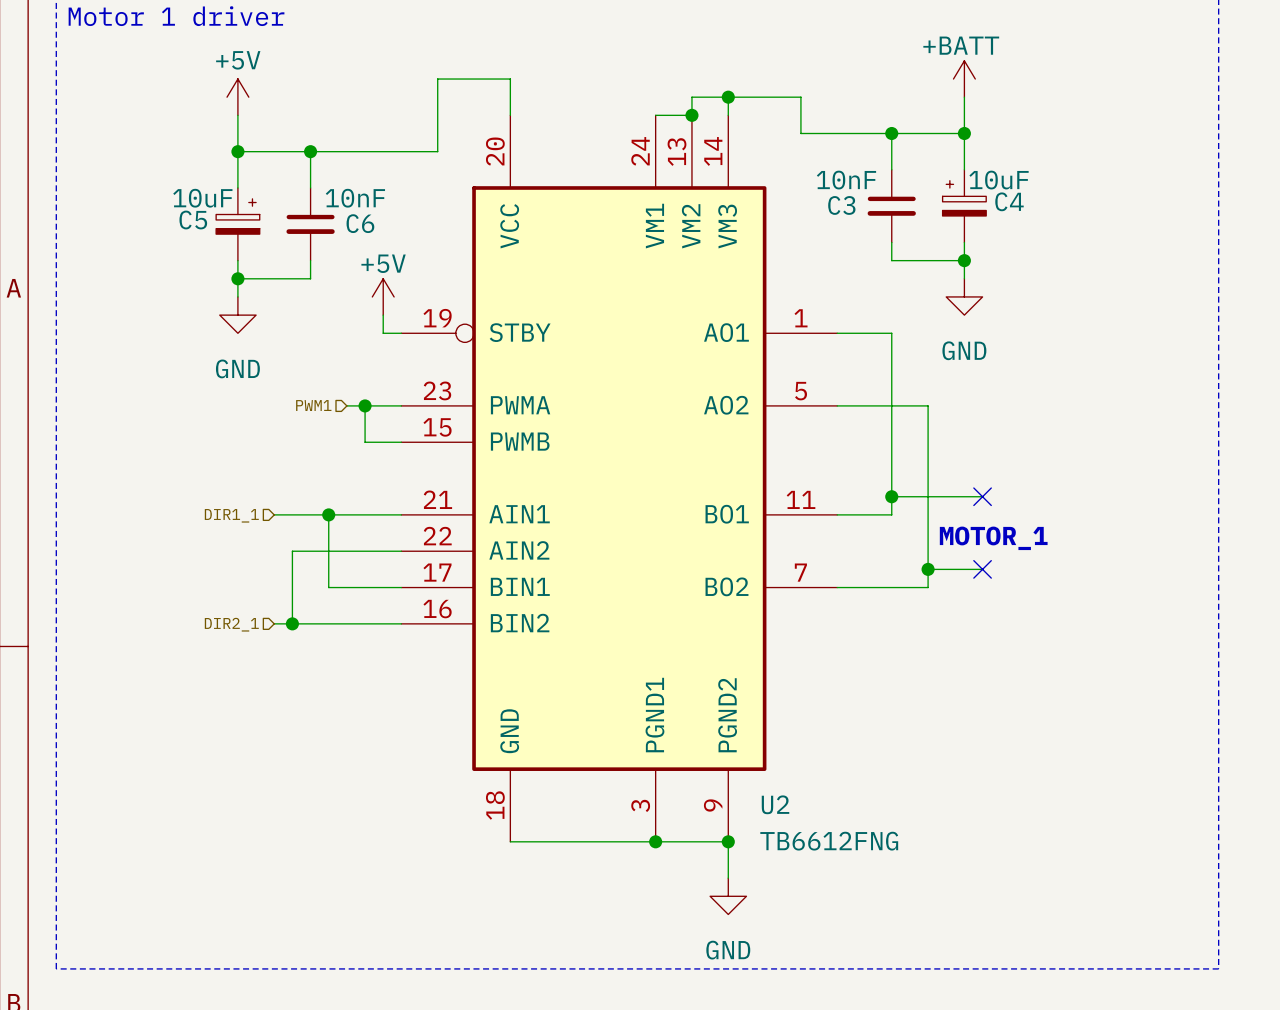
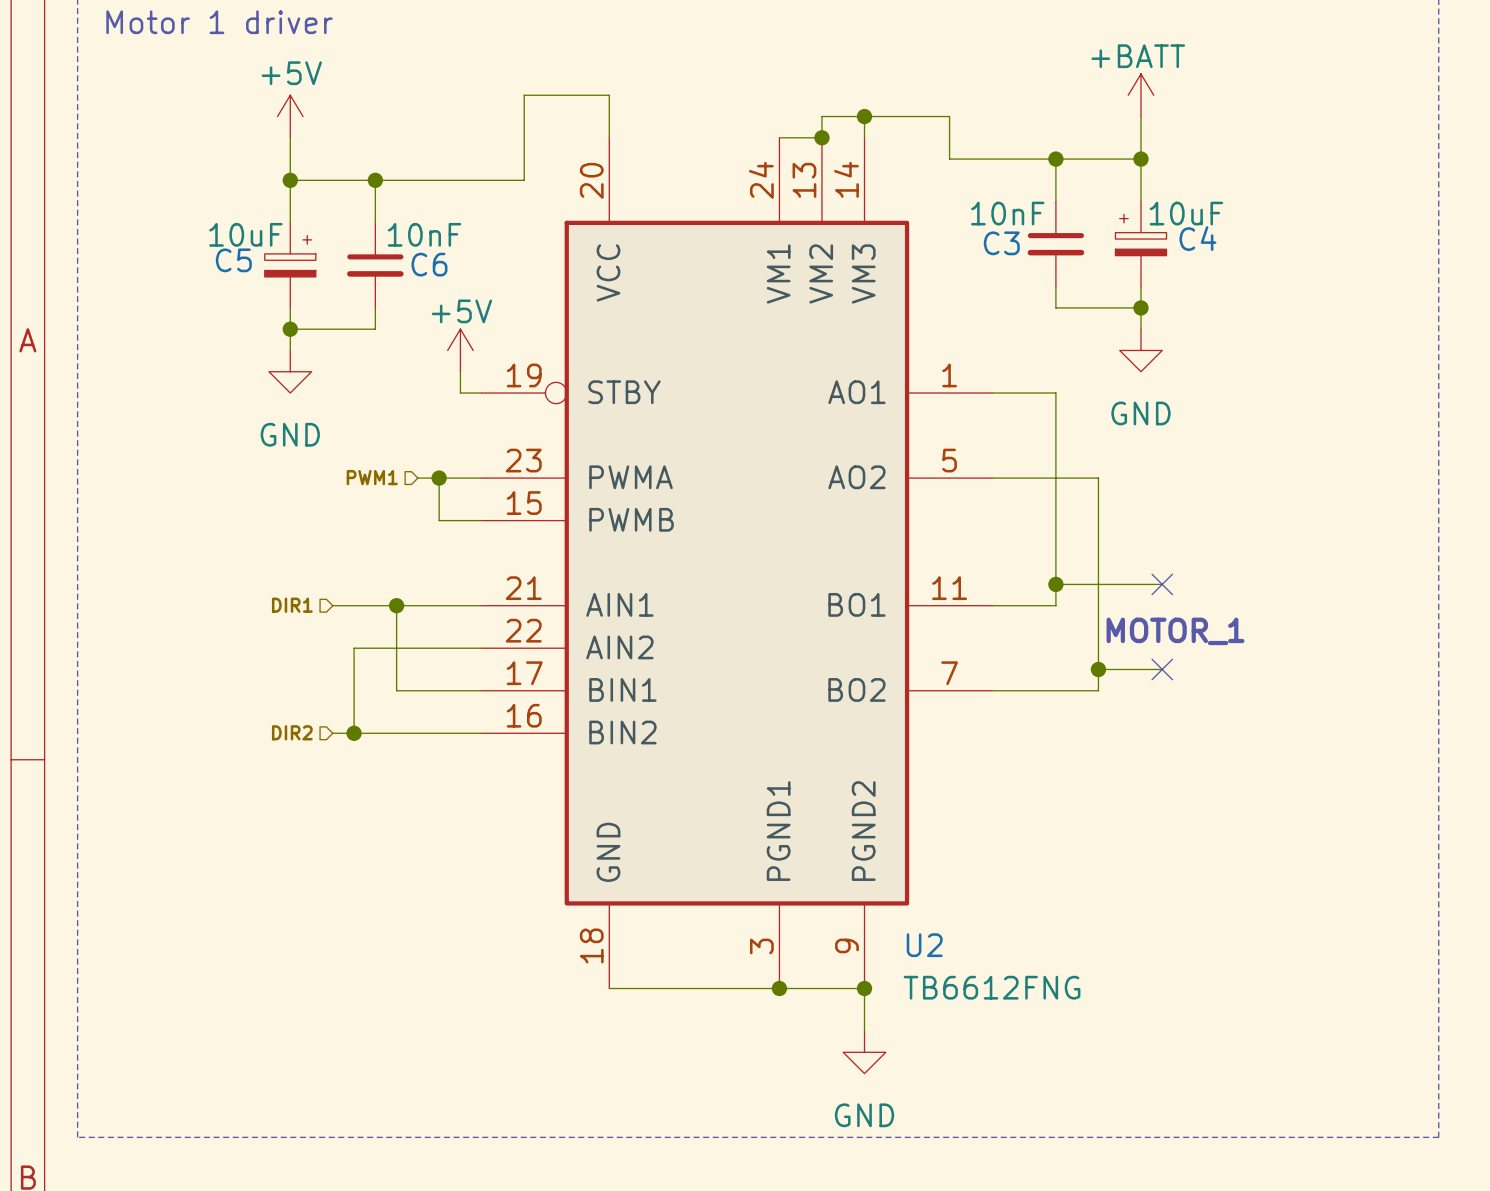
hierarchical label: DIR1_1 (231, 515) -> DIR1 (292, 605)
hierarchical label: DIR2_1 (231, 624) -> DIR2 (292, 732)

